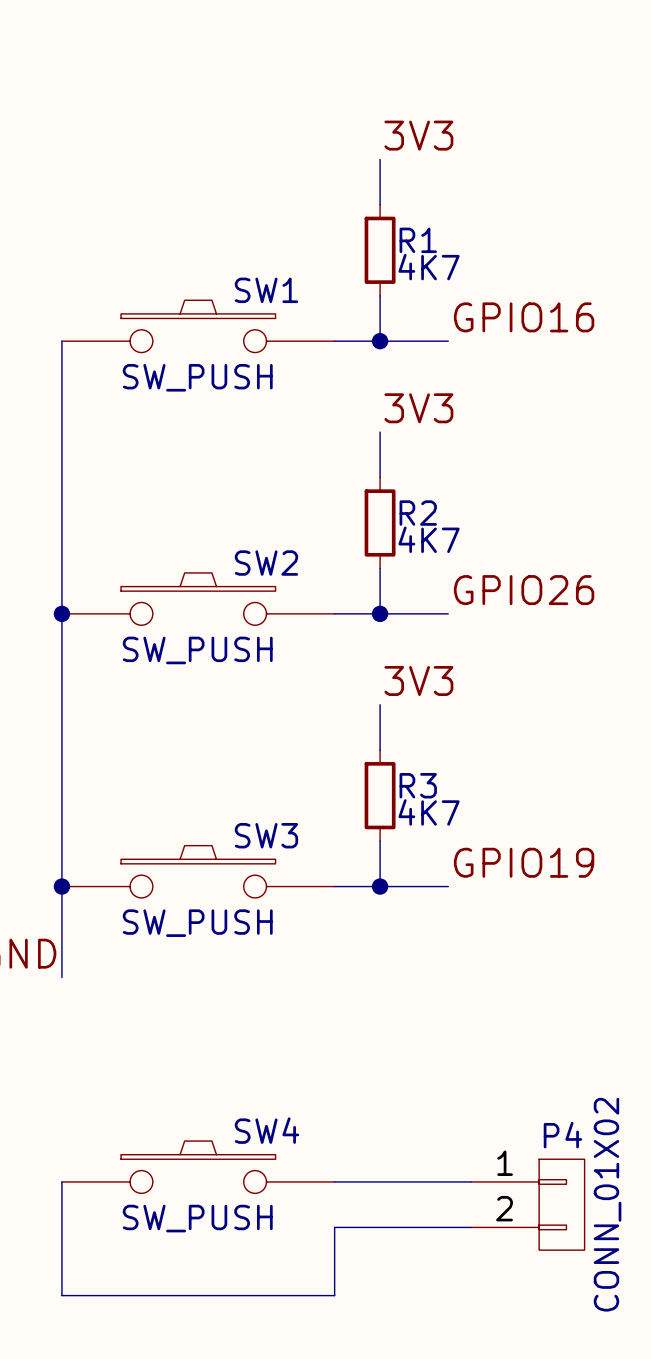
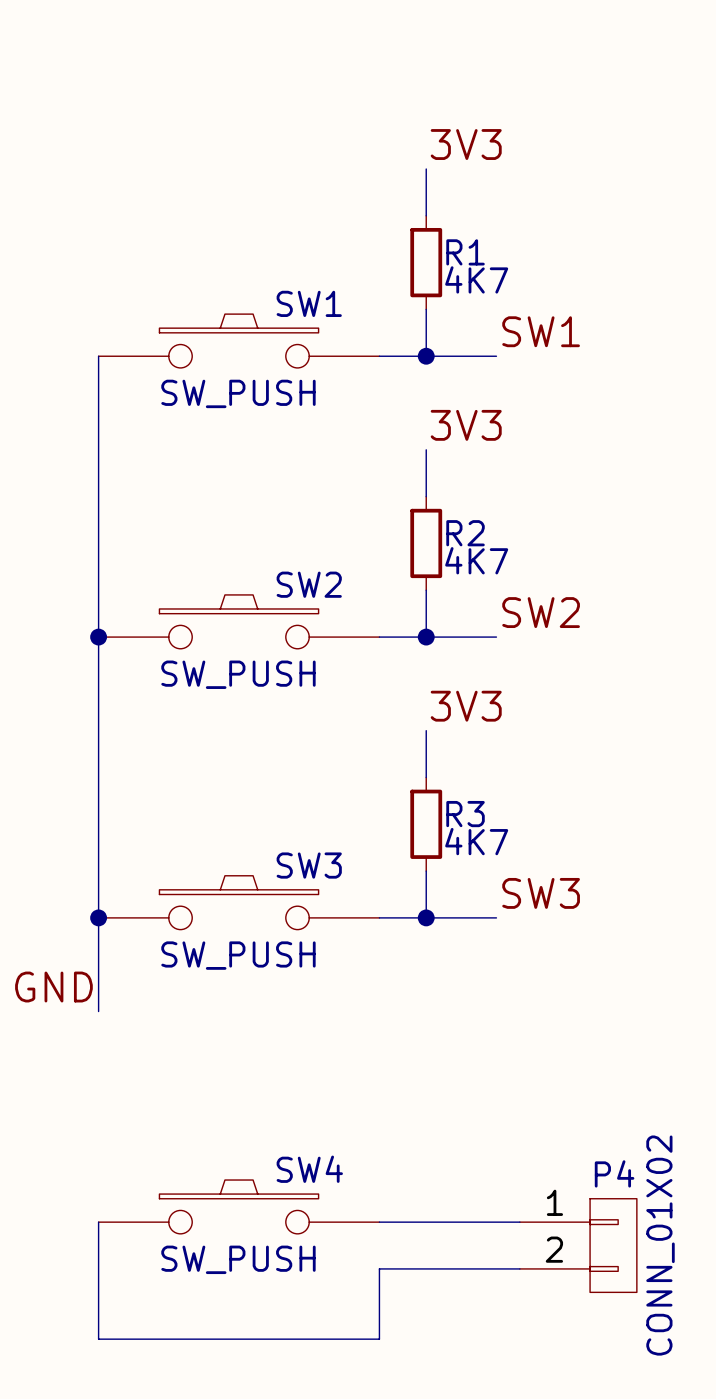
label: GPIO16 (524, 317) -> SW1 (541, 331)
label: GPIO26 (524, 590) -> SW2 (541, 612)
label: GPIO19 (524, 862) -> SW3 (541, 893)

